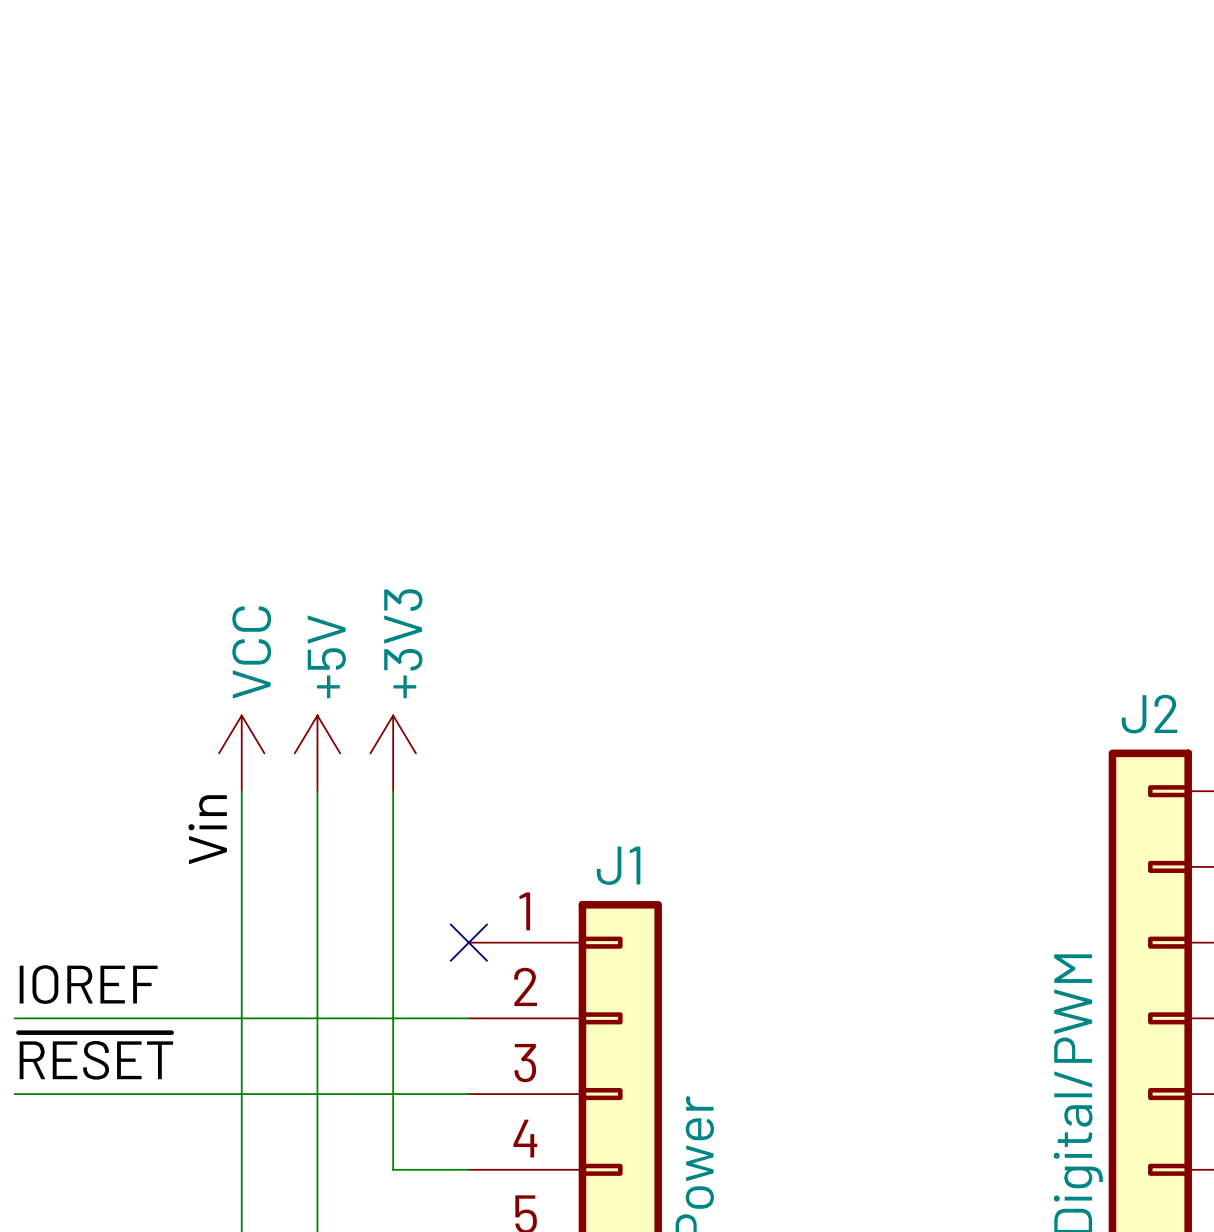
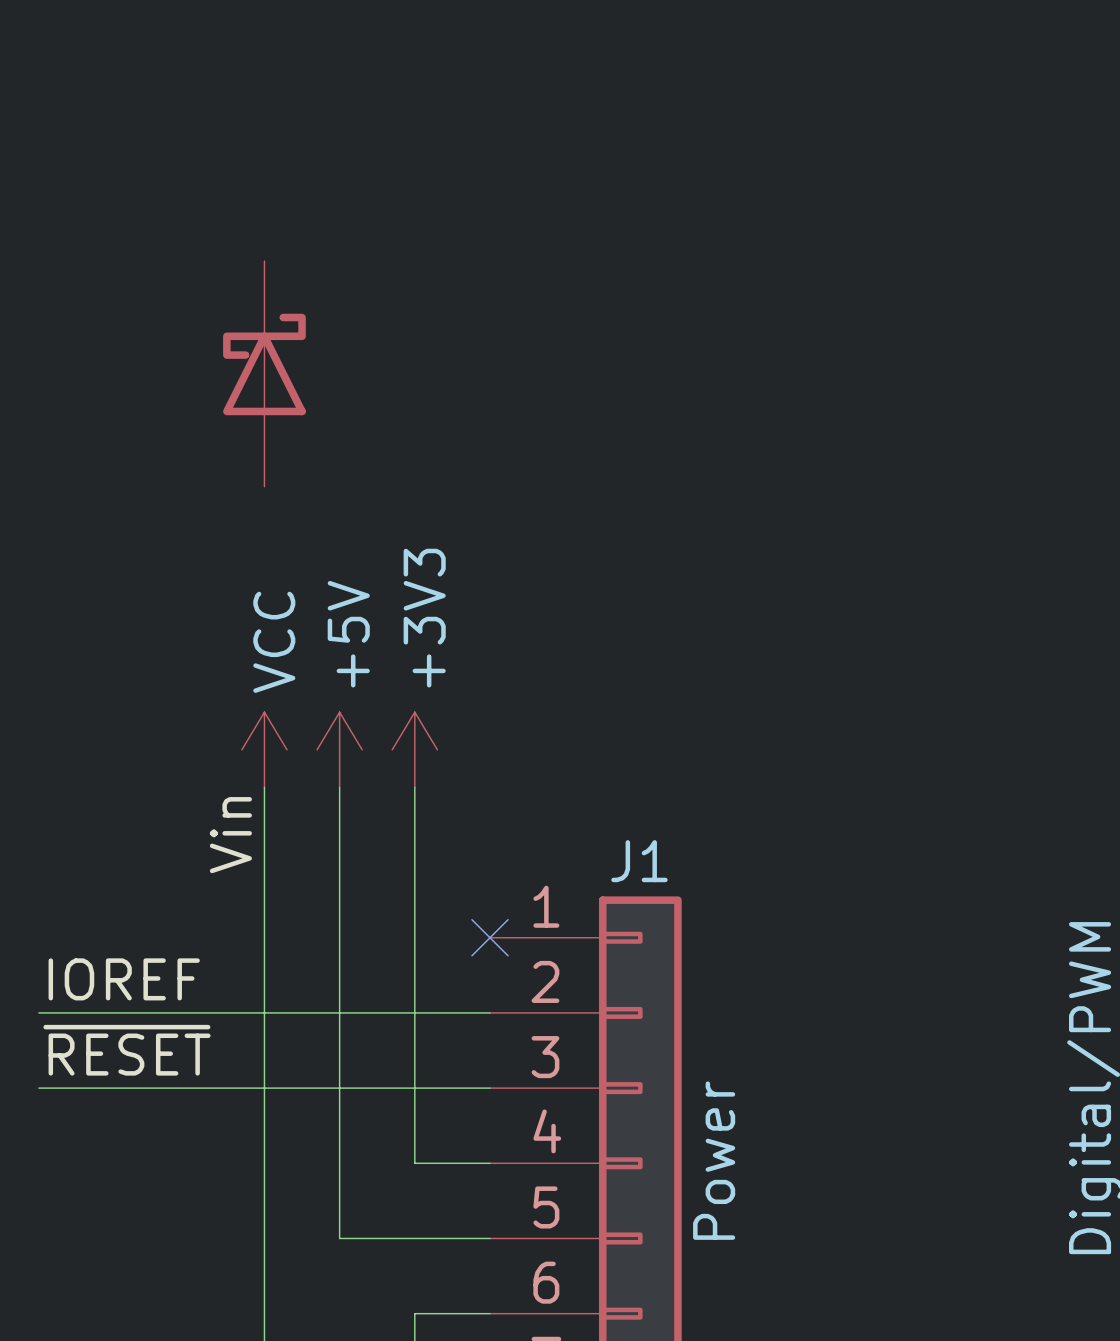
part: none -> (264, 373)

